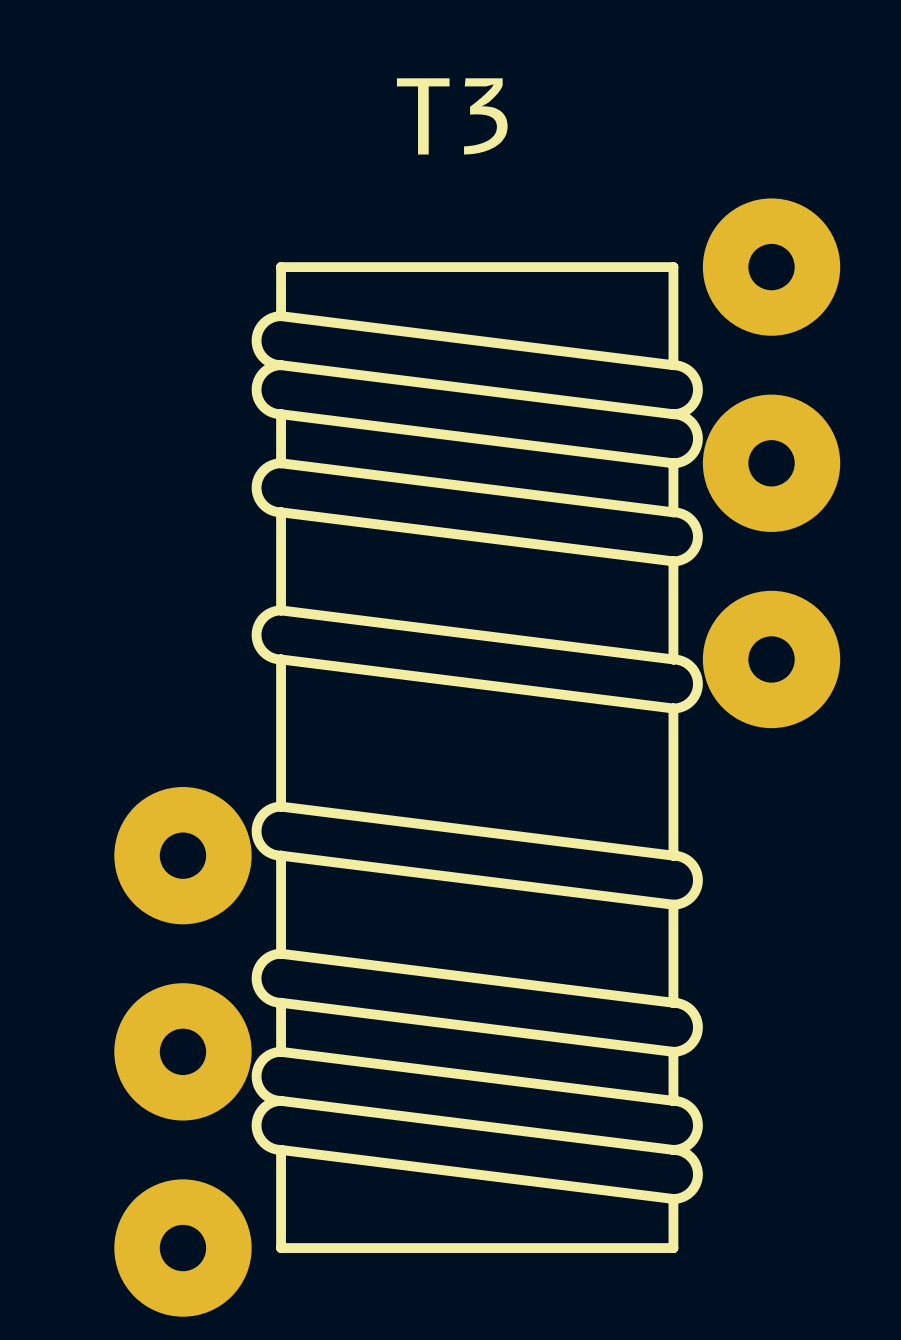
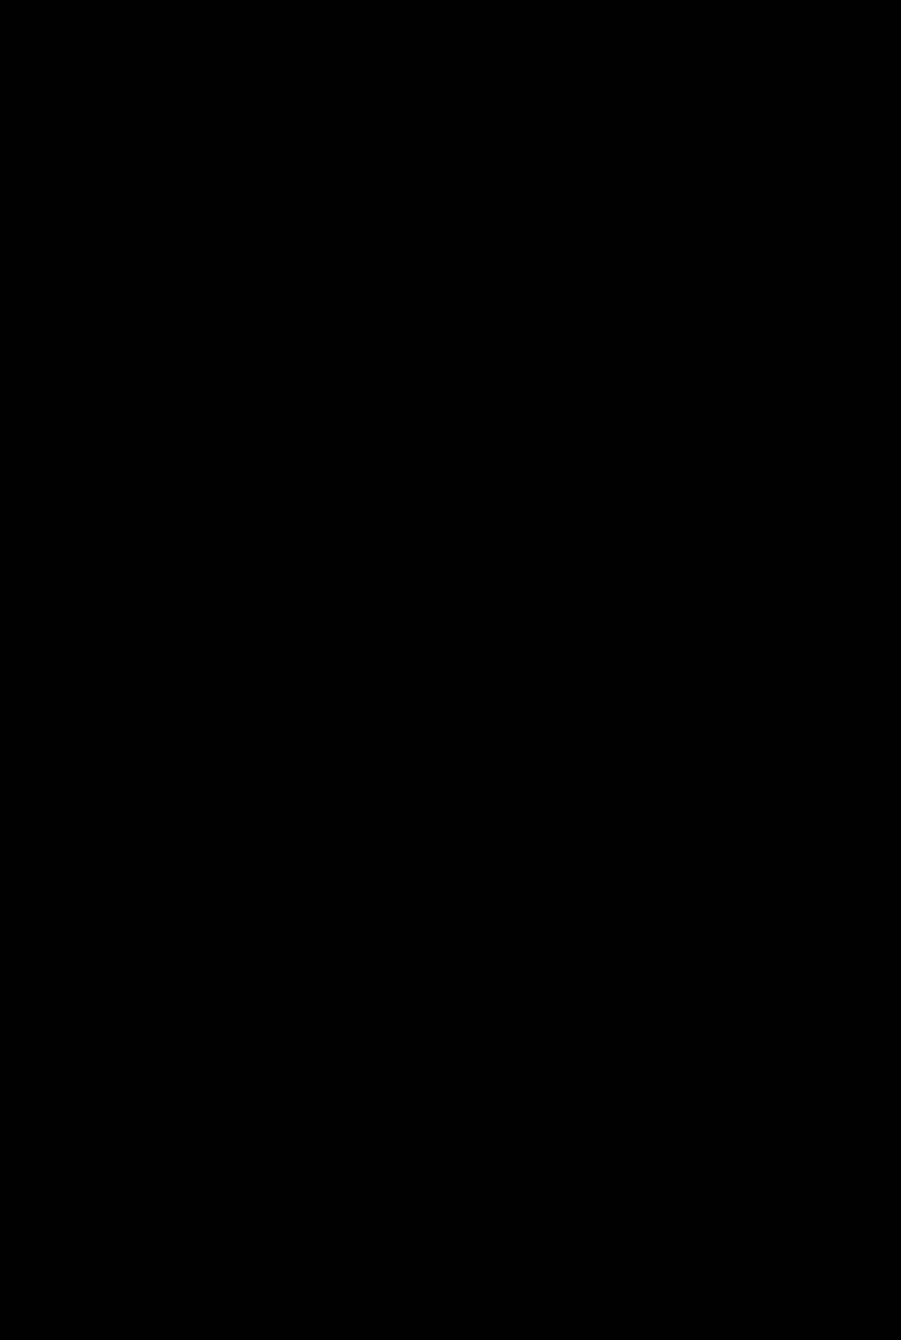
T3: (477, 757) -> none

